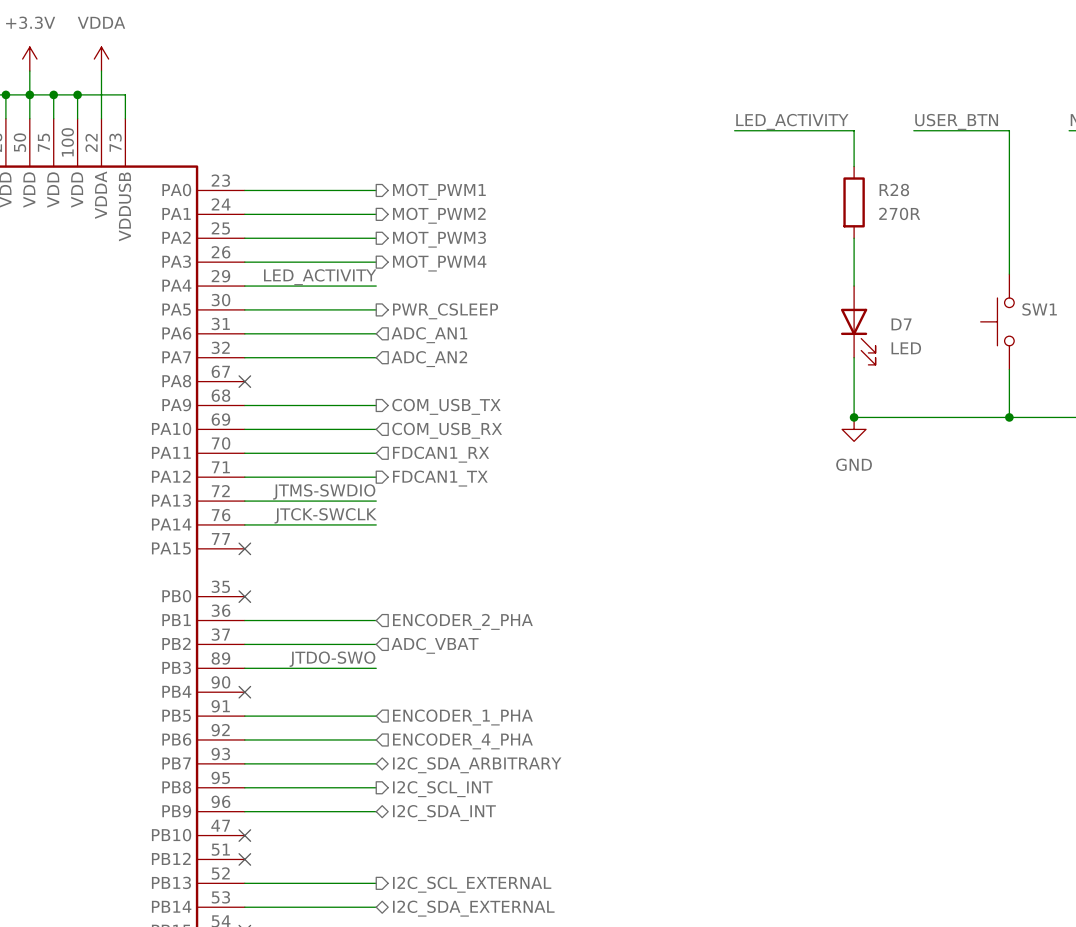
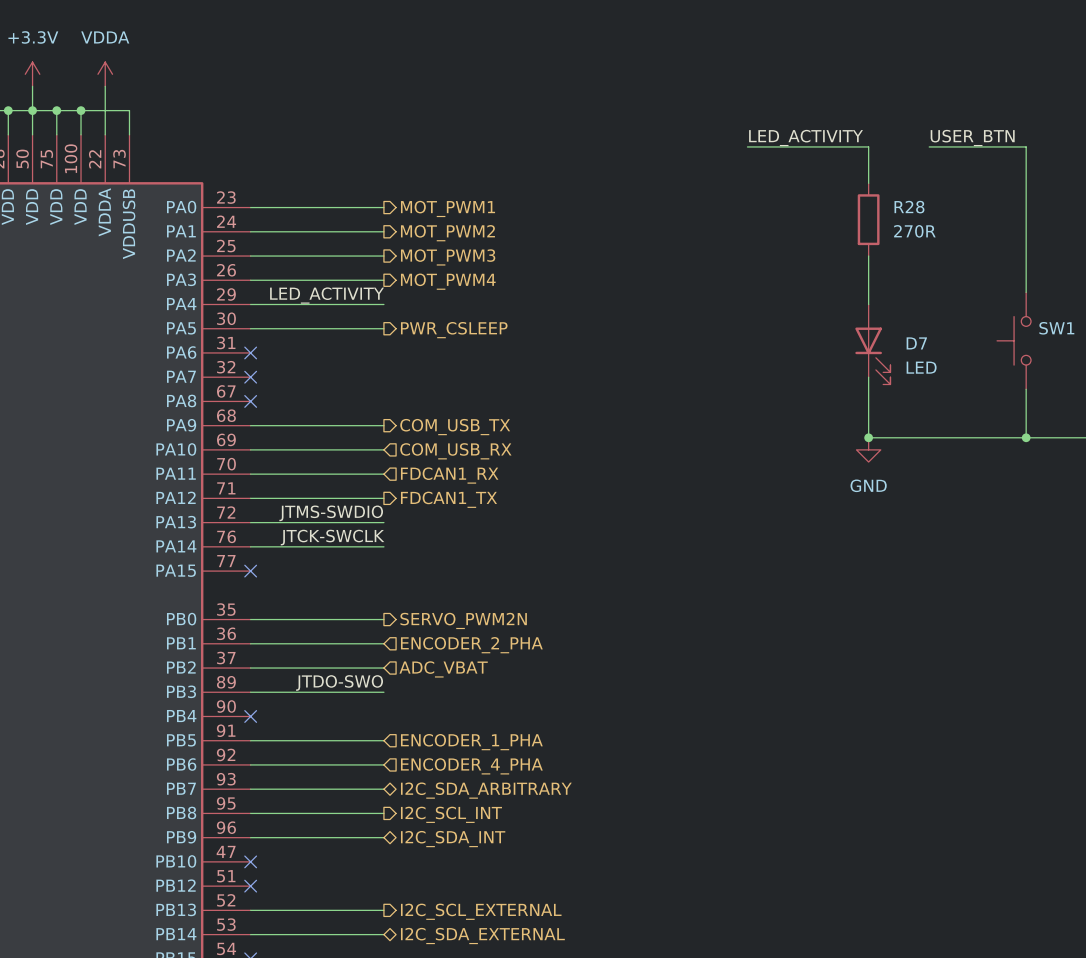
wire: (244, 333) (376, 333) -> none
no-connect mark: none -> (250, 352)
hierarchical label: ADC_AN1 (429, 335) -> none
wire: (244, 357) (376, 357) -> none
no-connect mark: none -> (250, 377)
hierarchical label: ADC_AN2 (429, 359) -> none
wire: none -> (250, 619) (383, 619)
no-connect mark: (244, 596) -> none
hierarchical label: none -> SERVO_PWM2N (463, 620)

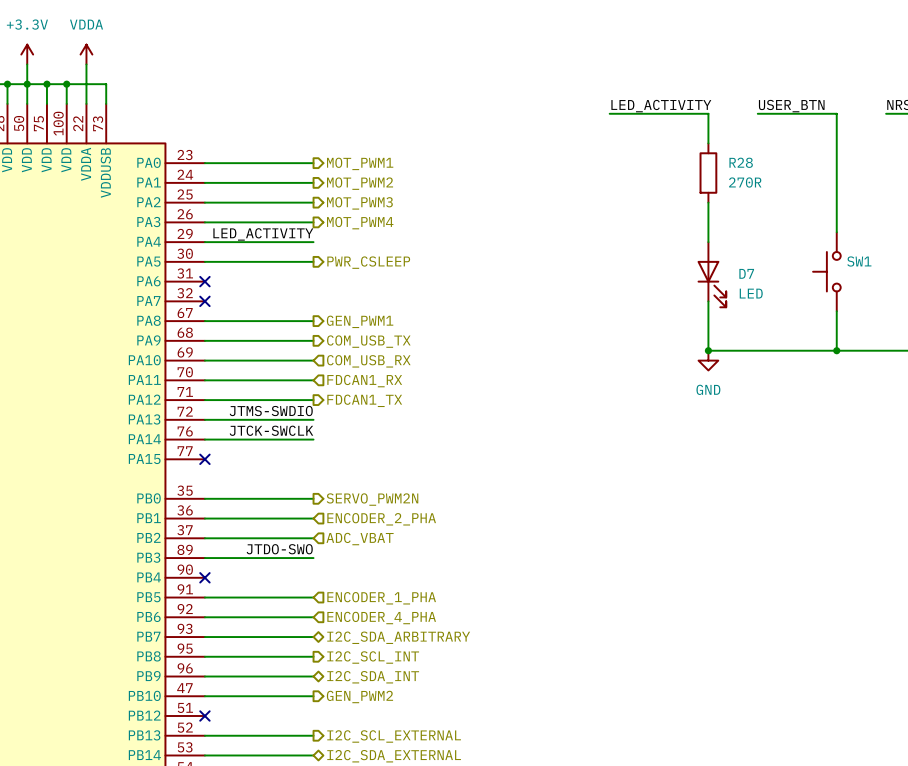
wire: none -> (204, 321) (313, 321)
no-connect mark: (250, 401) -> none
hierarchical label: none -> GEN_PWM1 (360, 321)
wire: none -> (204, 696) (313, 696)
no-connect mark: (250, 861) -> none
hierarchical label: none -> GEN_PWM2 (359, 696)

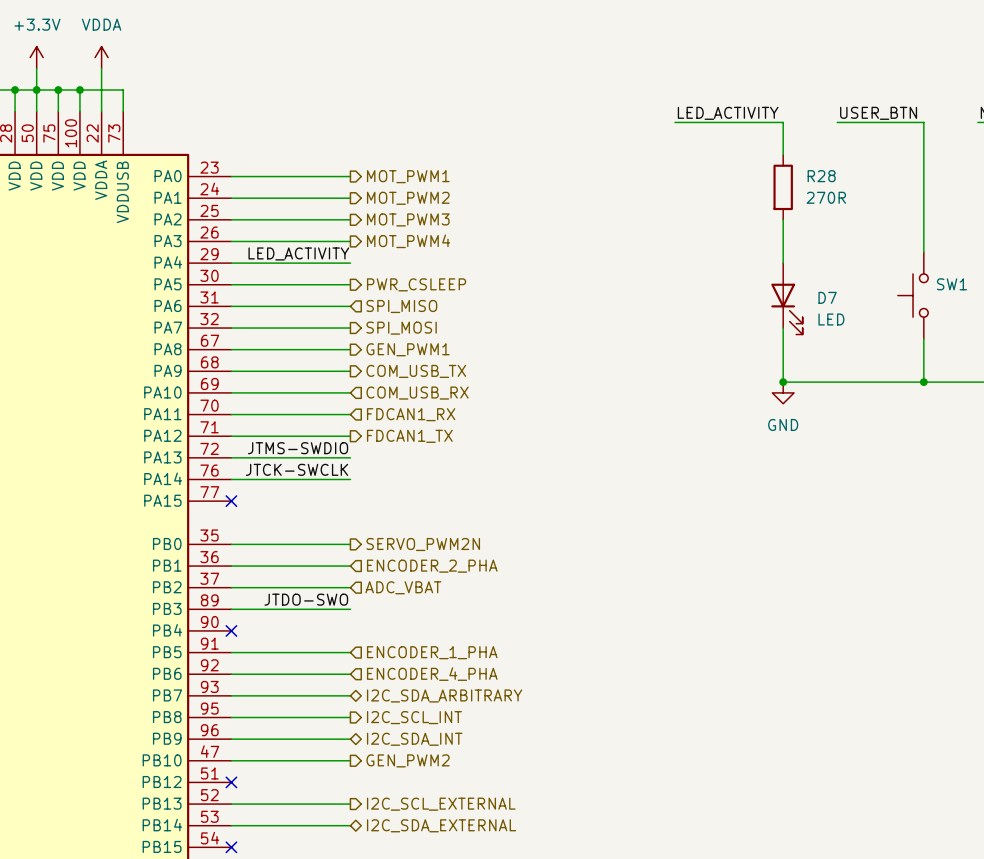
wire: none -> (231, 306) (350, 306)
no-connect mark: (204, 281) -> none
hierarchical label: none -> SPI_MISO (401, 306)
wire: none -> (231, 328) (350, 328)
no-connect mark: (204, 301) -> none
hierarchical label: none -> SPI_MOSI (401, 328)

